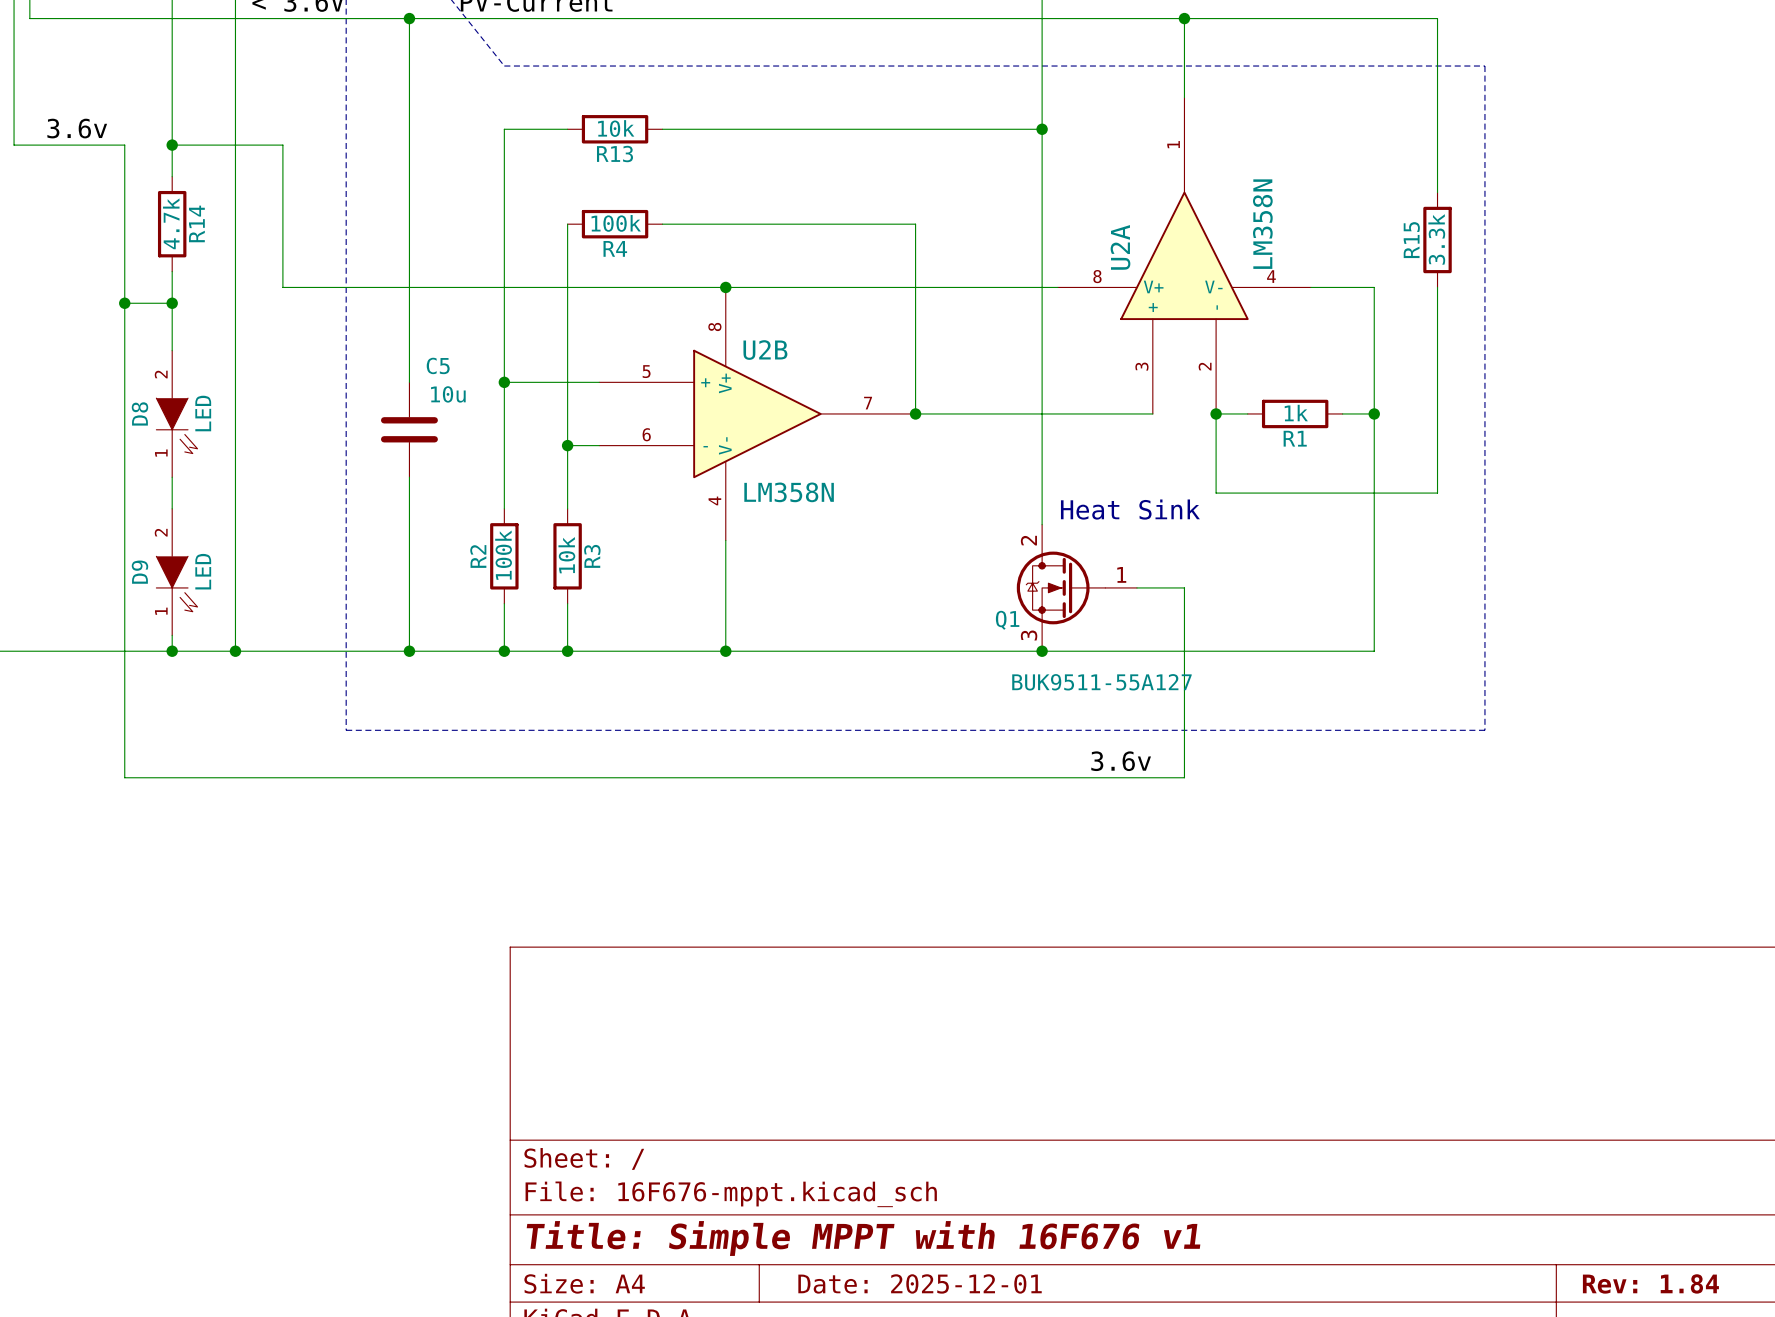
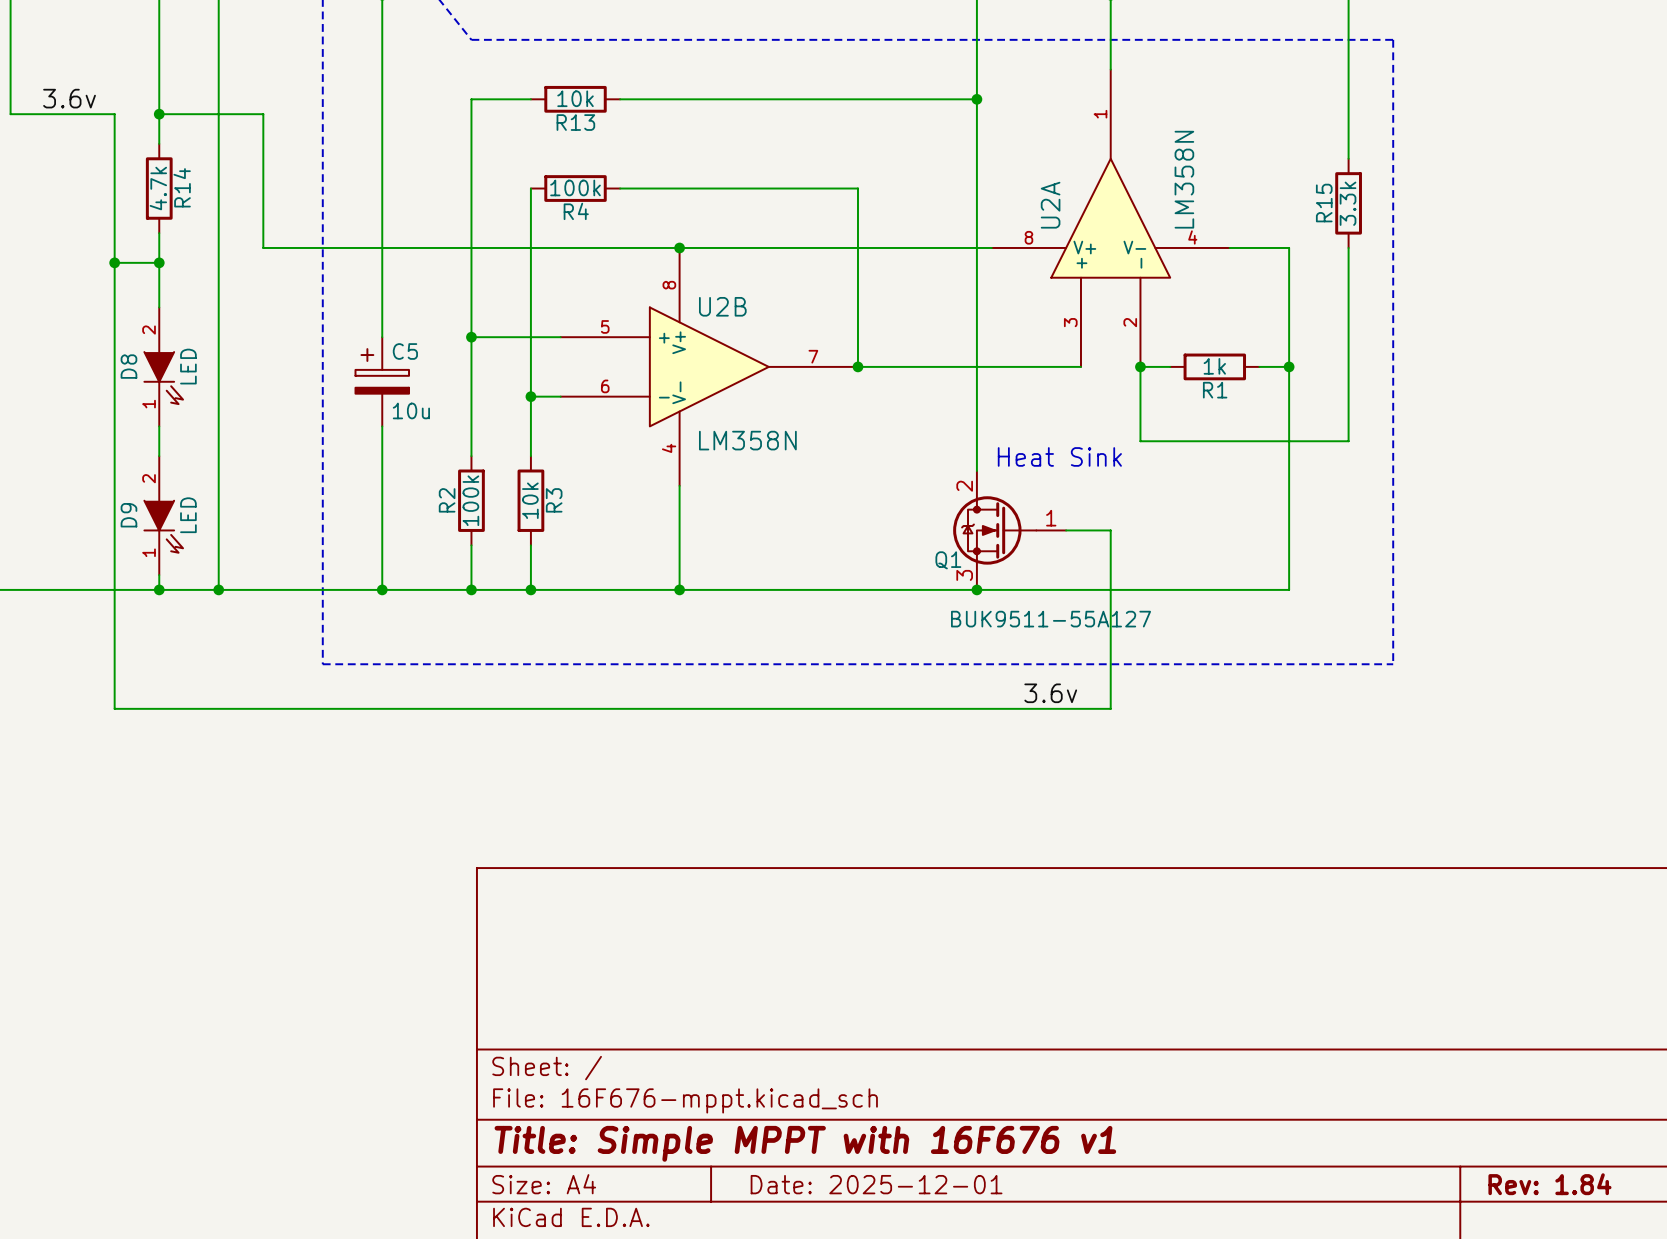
C5 name position: C5 (438, 365) -> C5 (405, 351)
C5 symbol: [380, 382, 438, 478] -> [355, 337, 410, 427]
C5 value position: 10u (448, 394) -> 10u (411, 410)

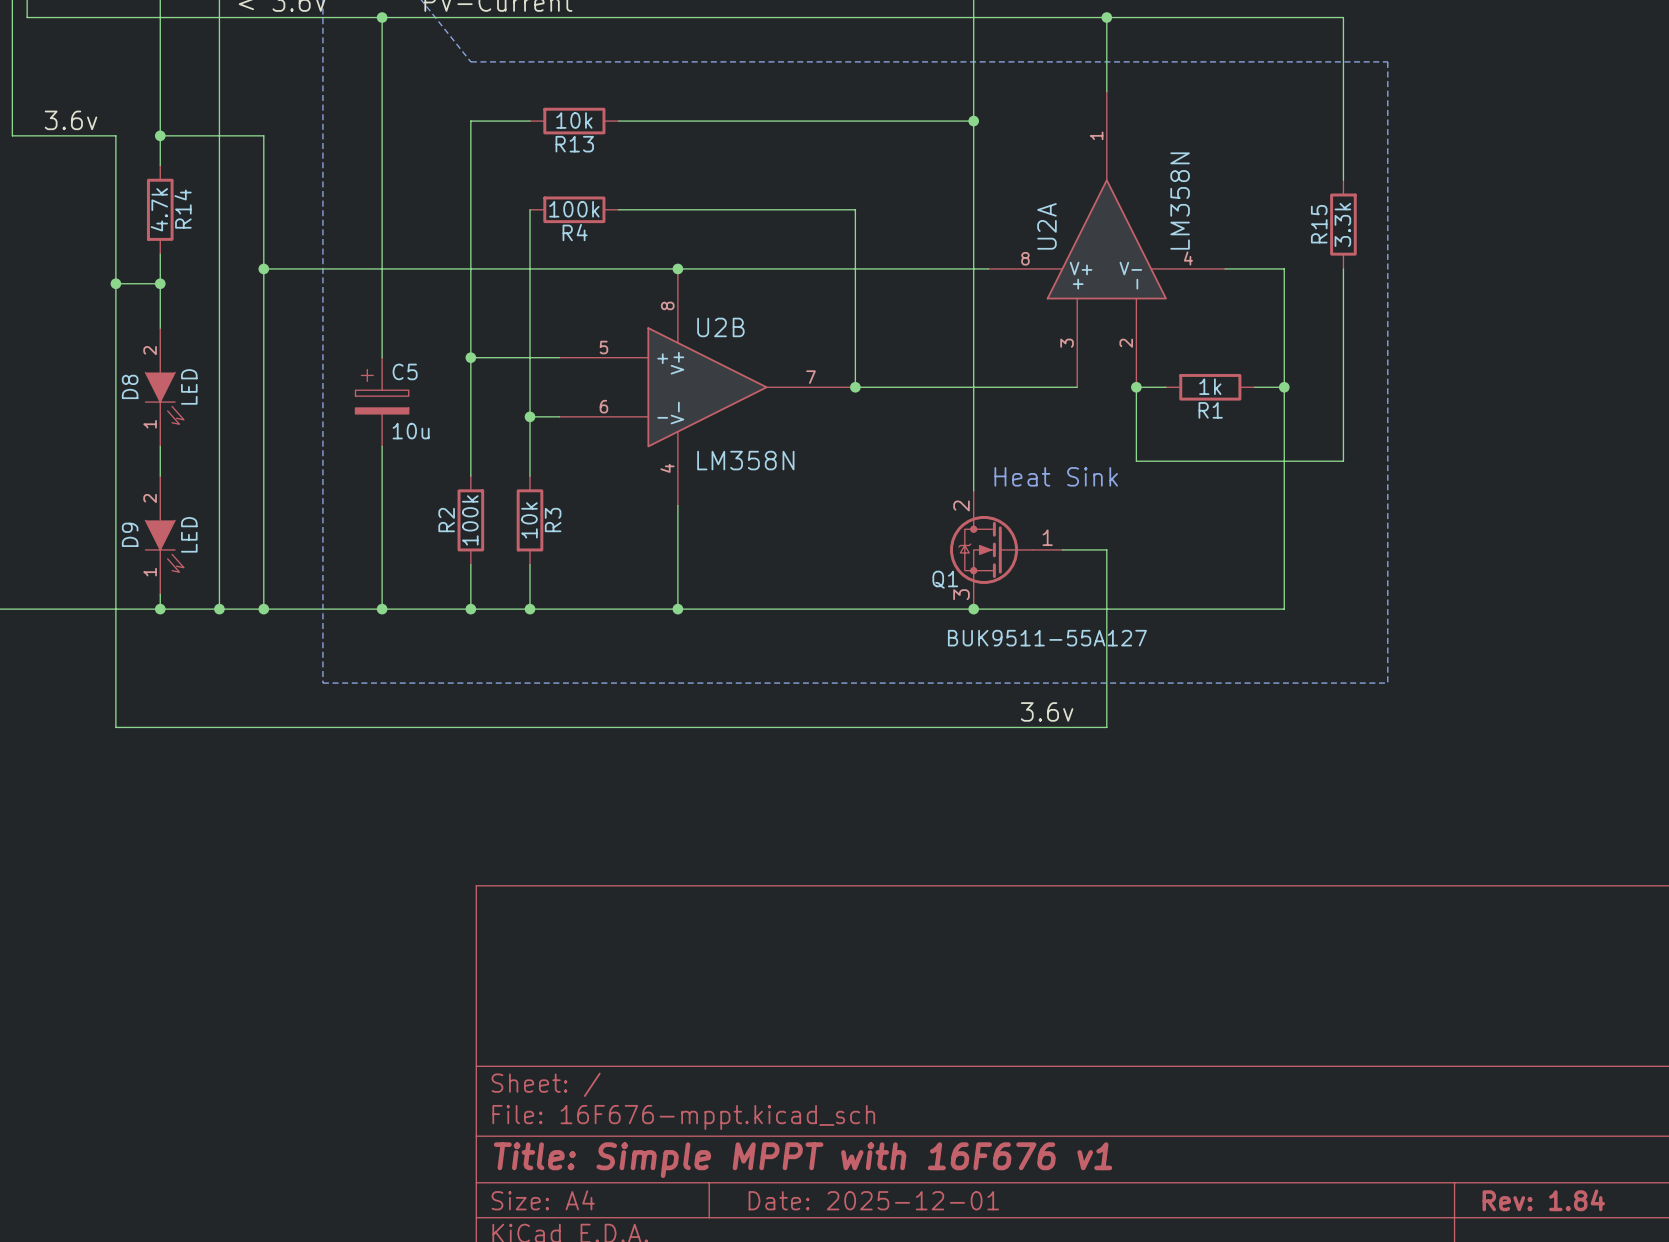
wire: none -> (263, 268) (263, 609)
junction: none -> (263, 268)
junction: none -> (263, 609)

